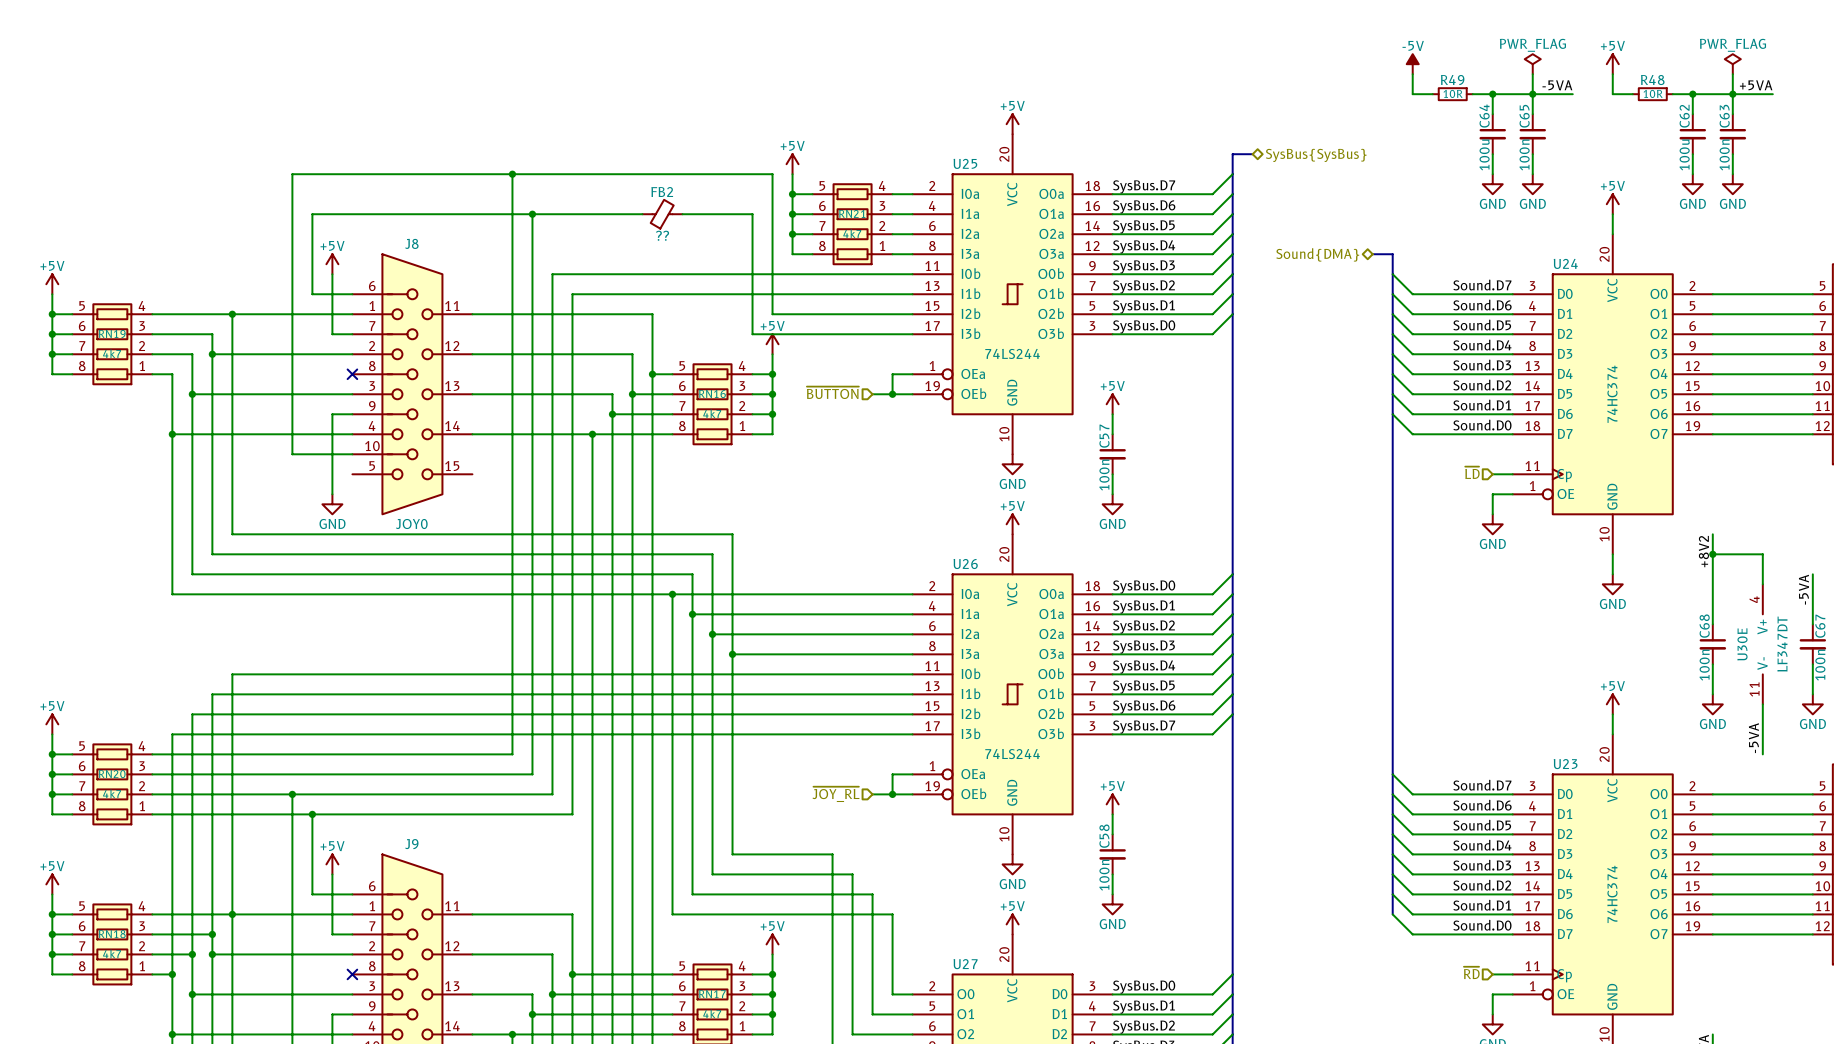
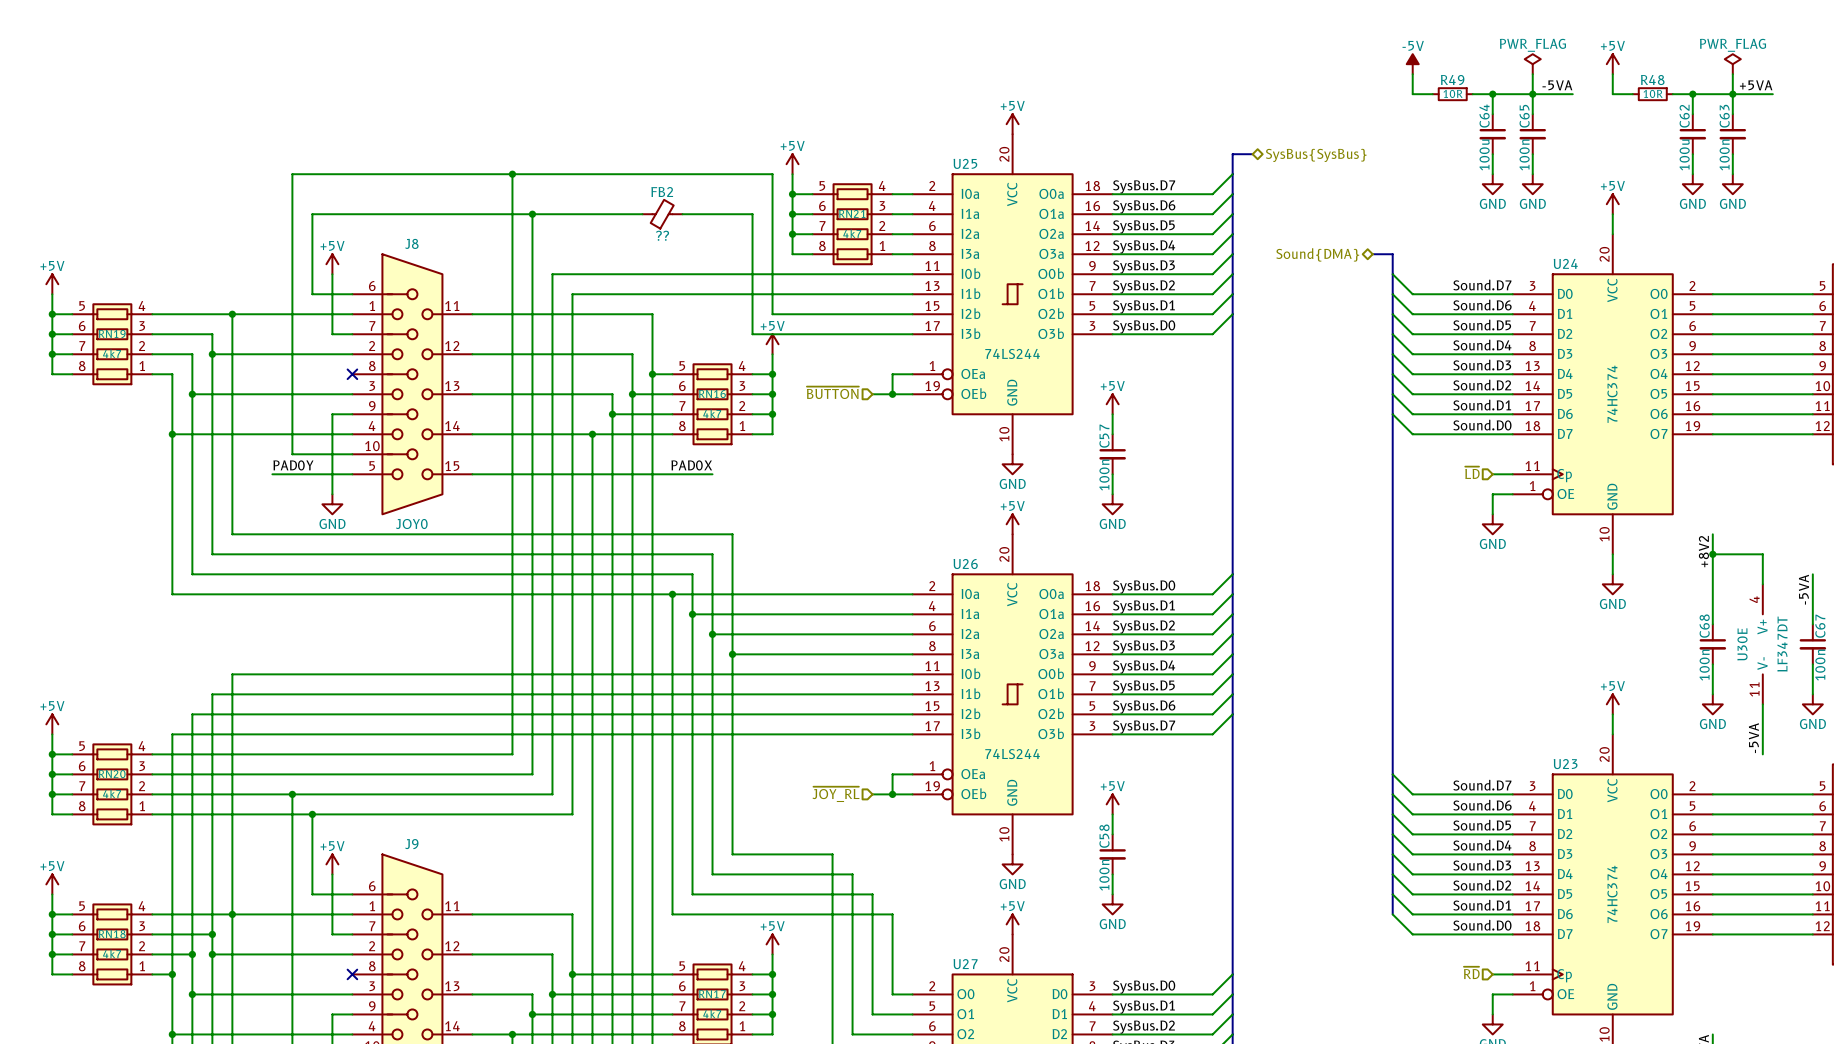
label: none -> PAD0Y (293, 465)
label: none -> PAD0X (691, 465)
wire: none -> (272, 474) (352, 474)
wire: none -> (472, 474) (712, 474)

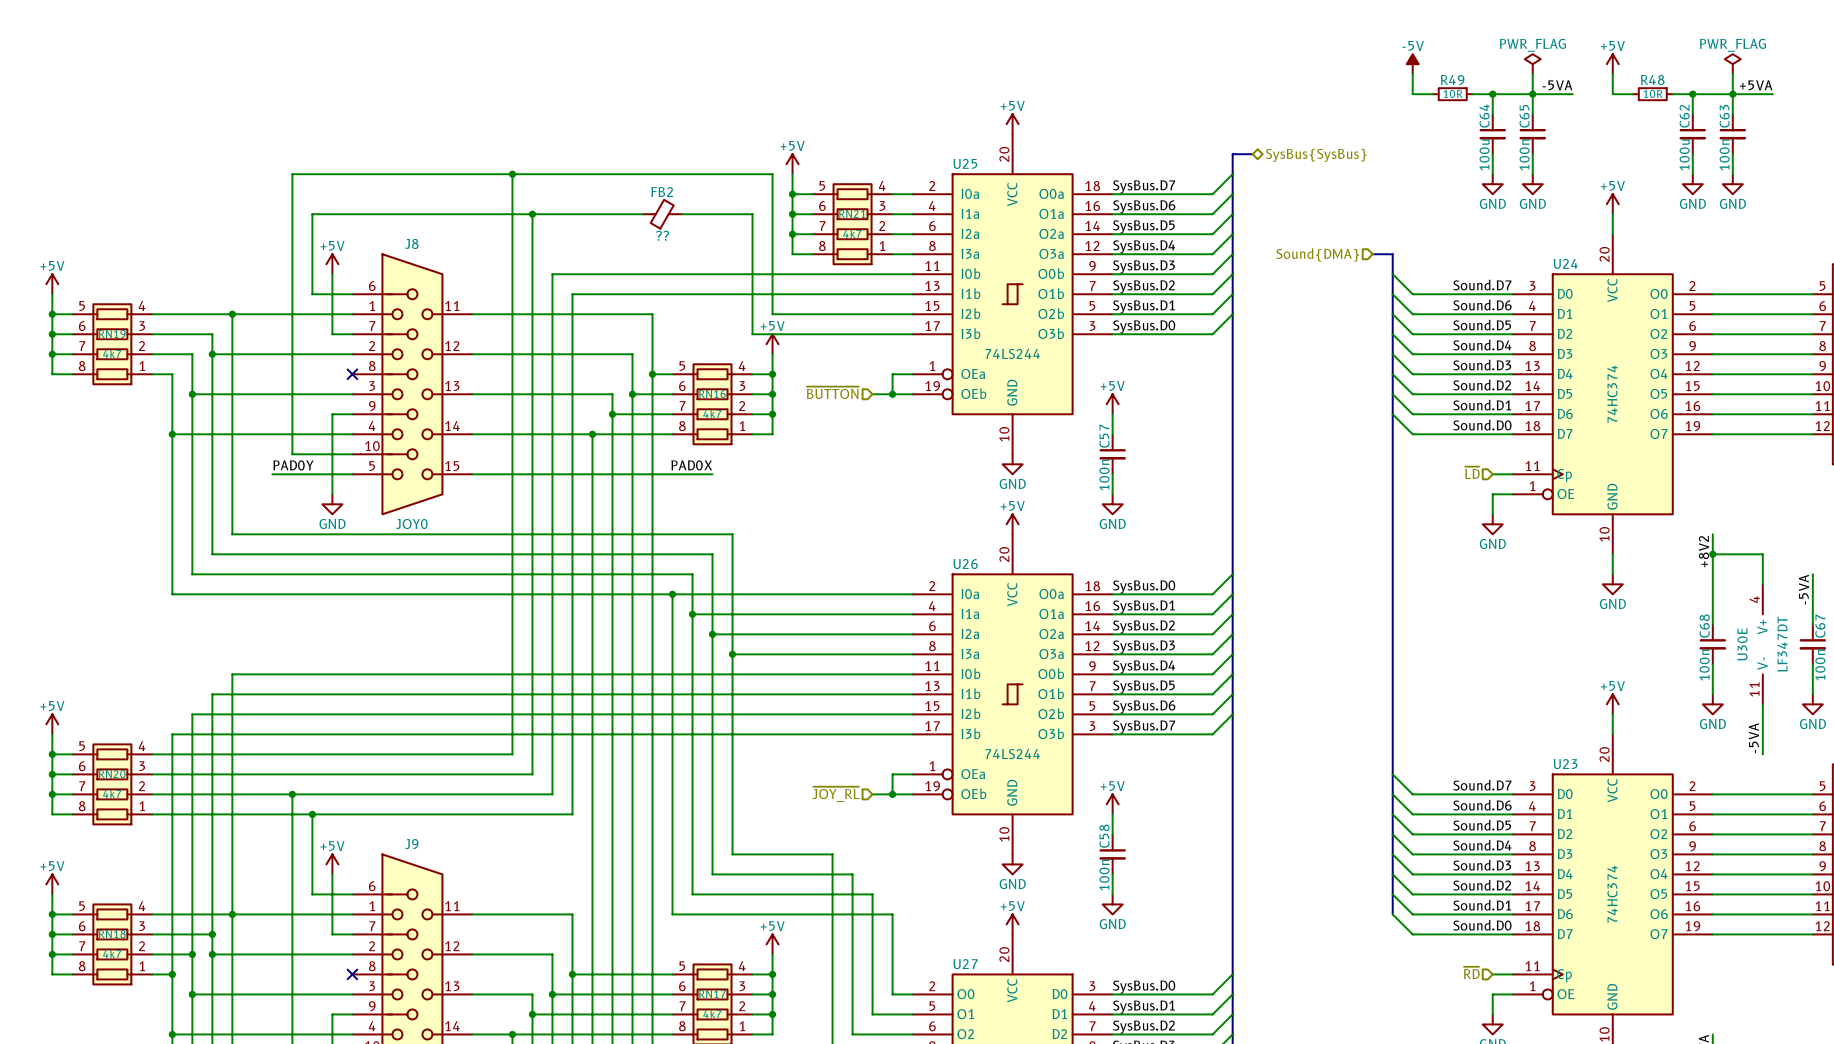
hierarchical label shape: bidirectional (1317, 254) -> input (1317, 254)

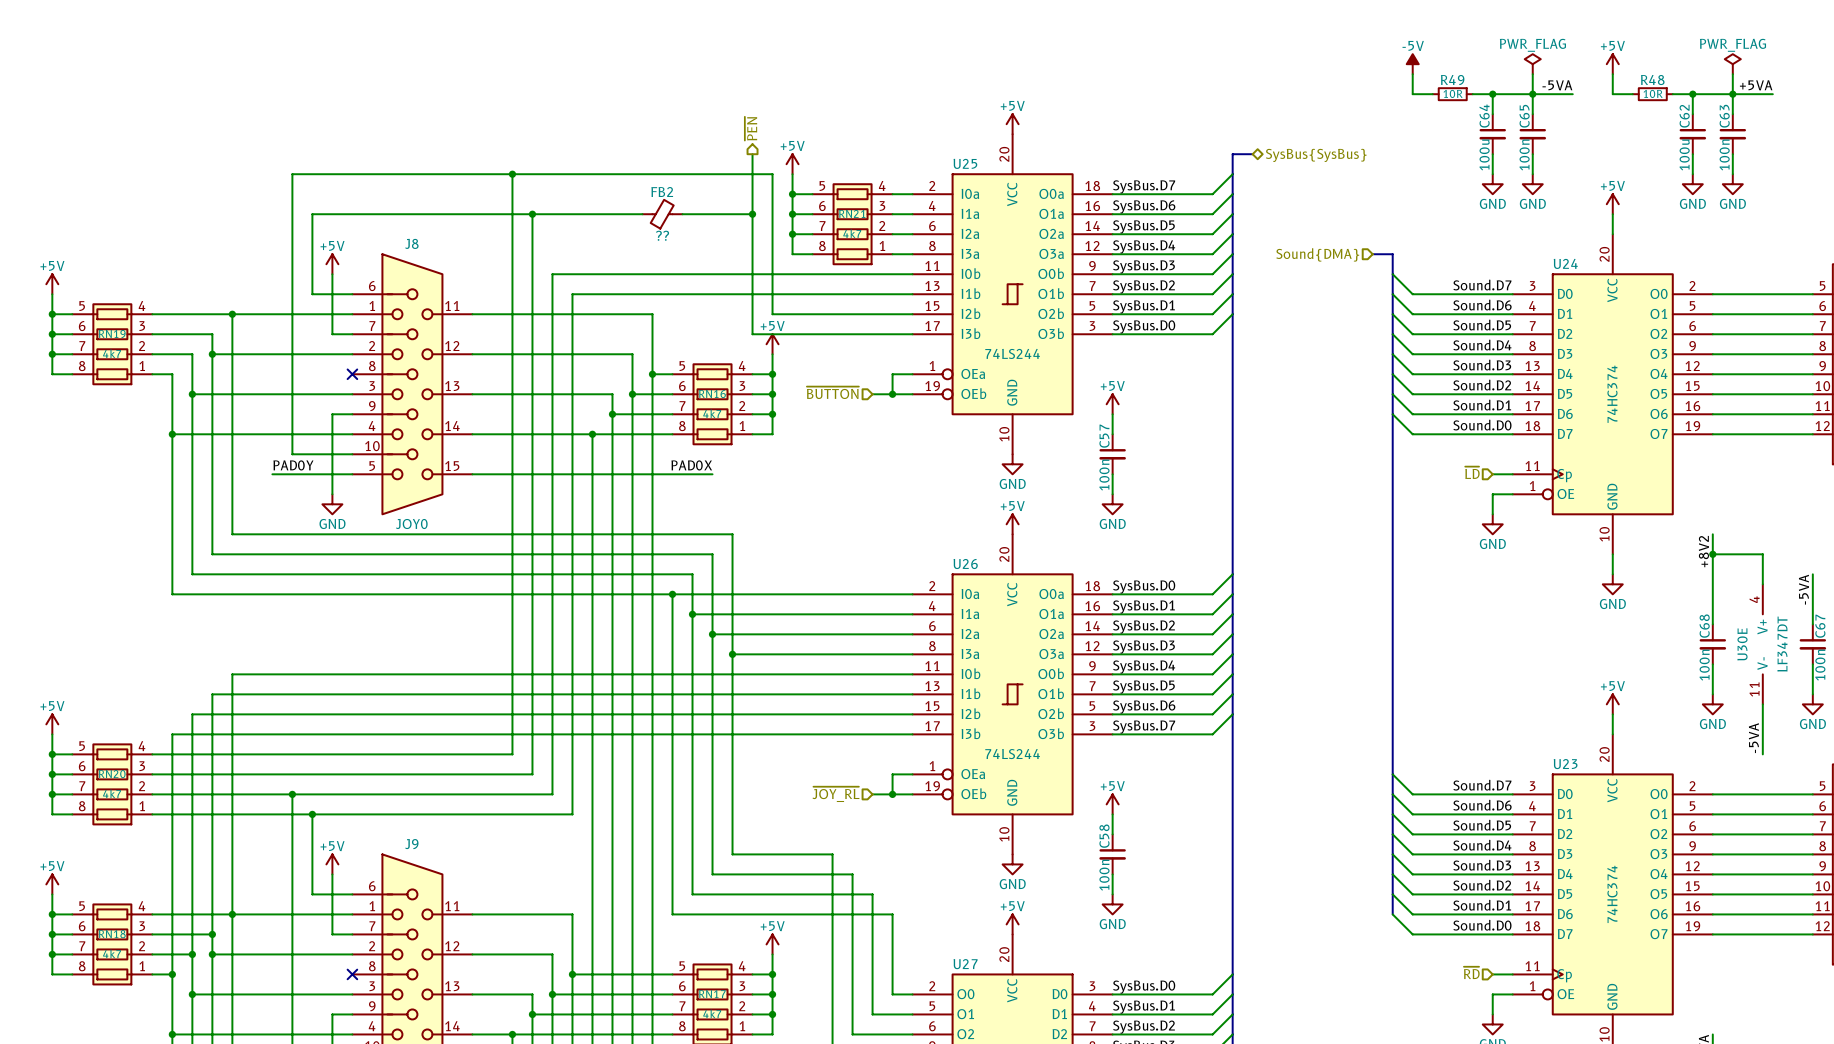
hierarchical label: none -> ~{PEN} (751, 128)
wire: none -> (752, 154) (752, 214)
junction: none -> (752, 214)

